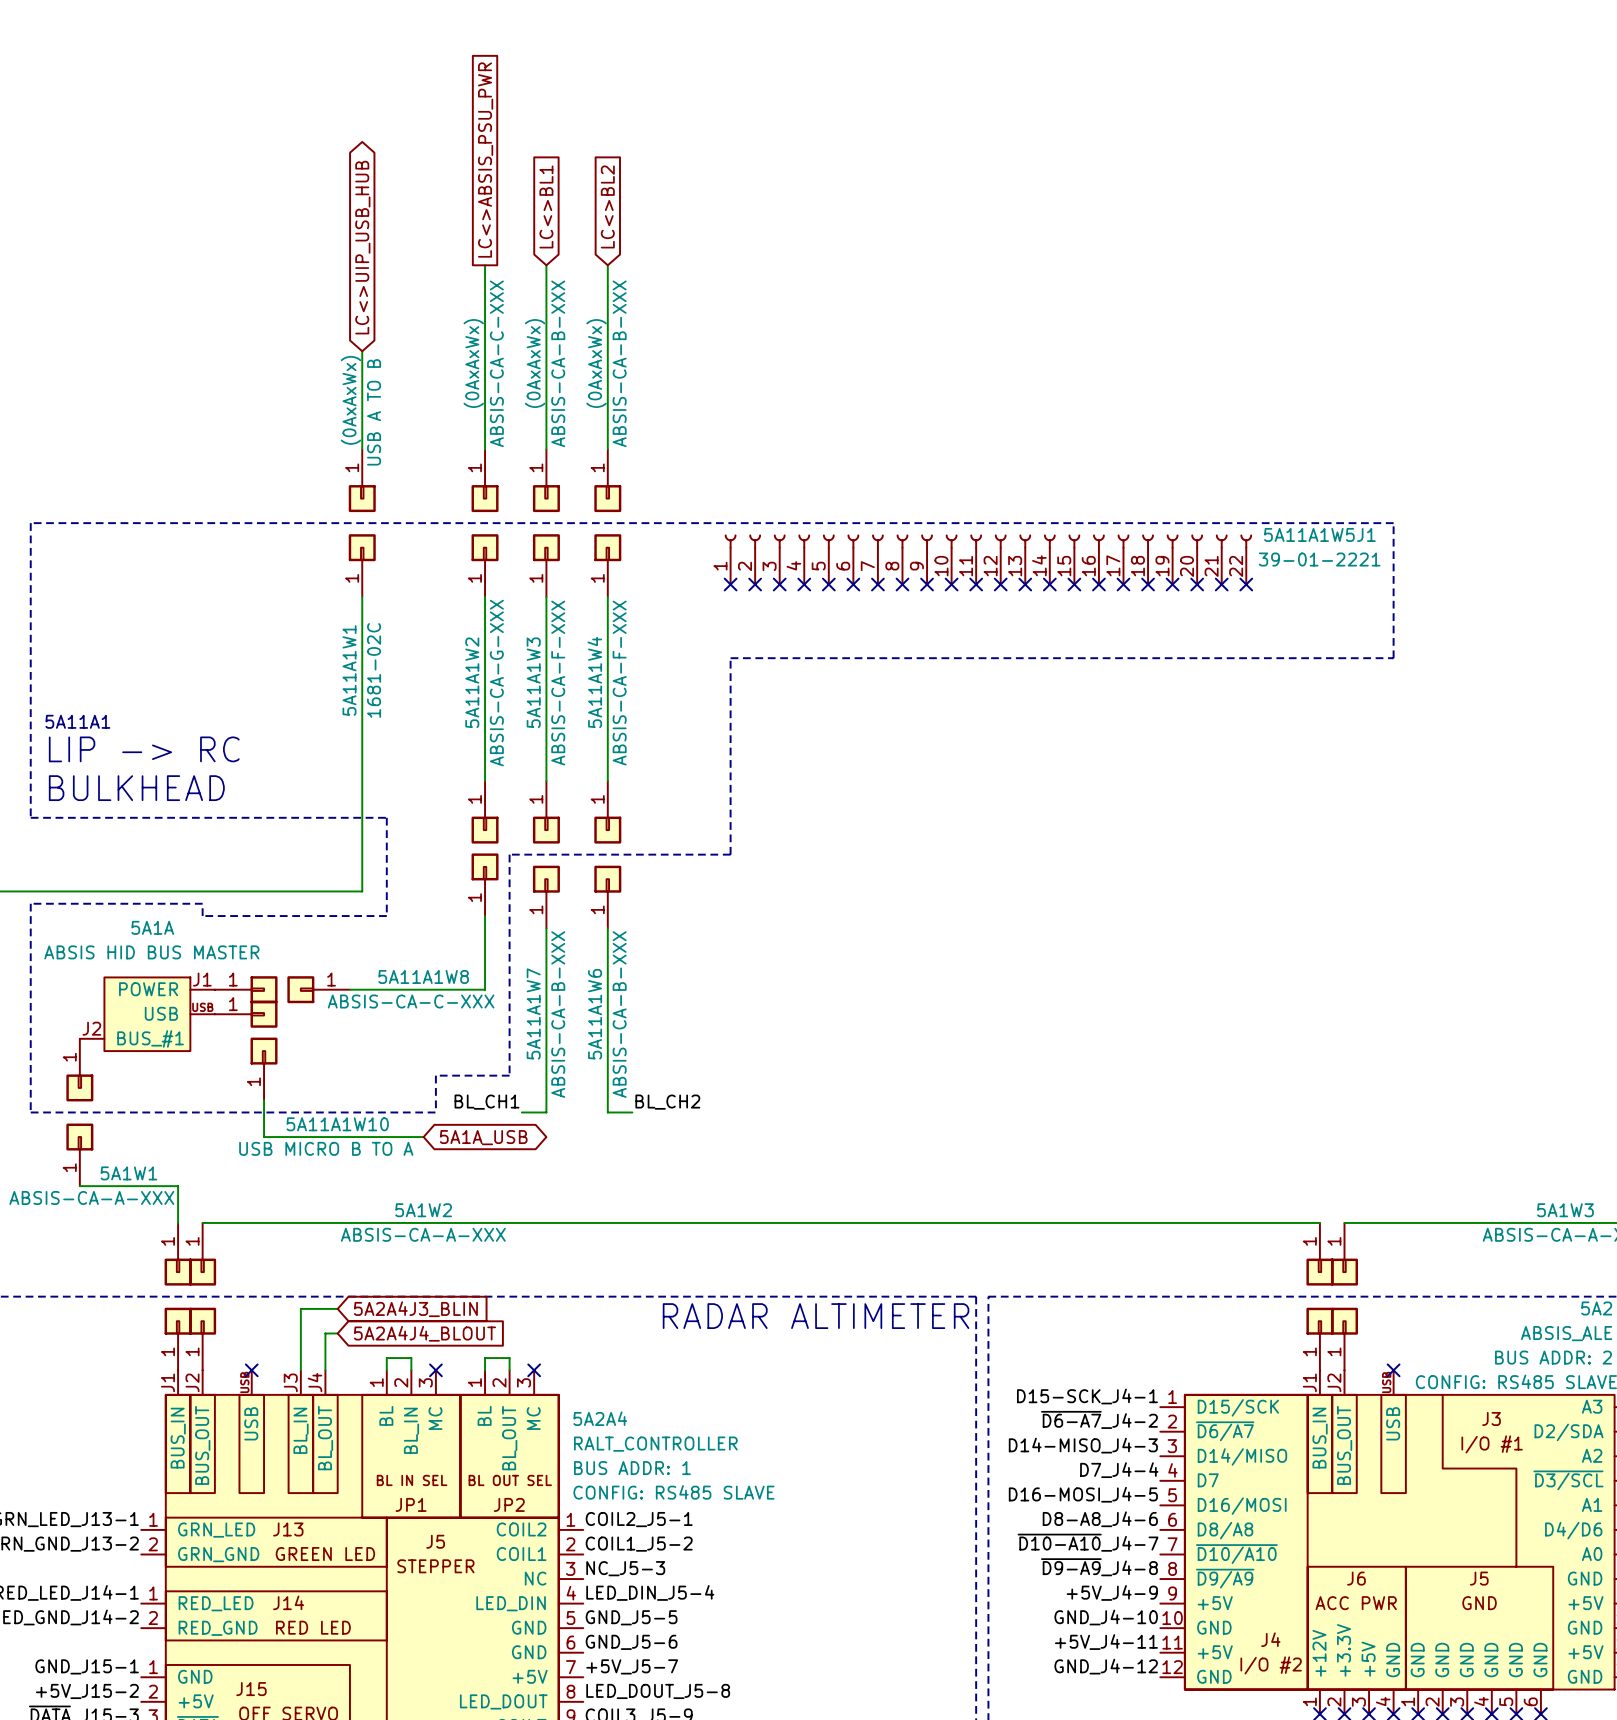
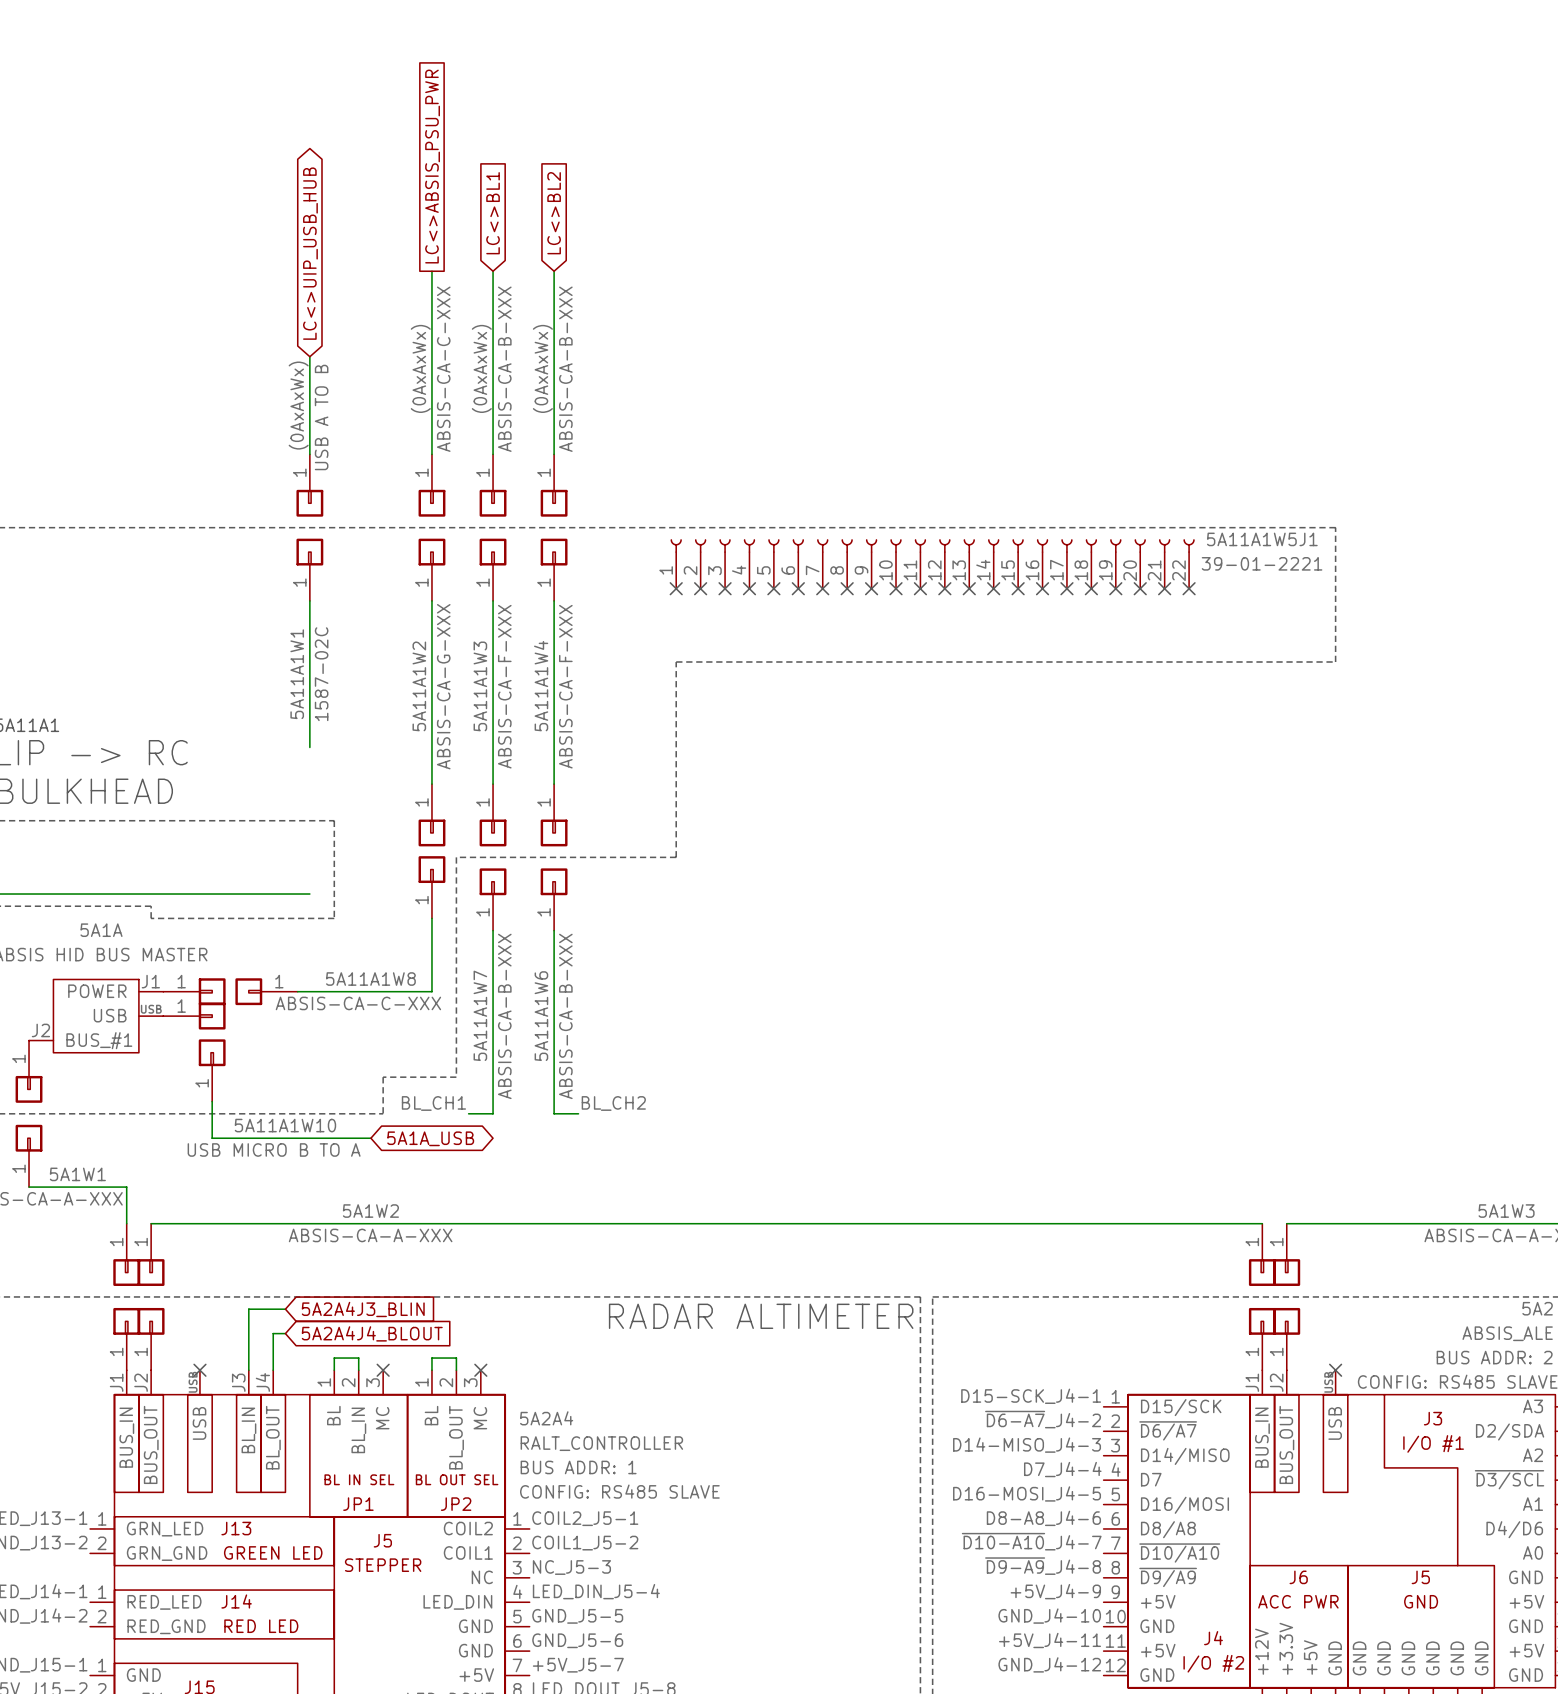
5A11A1W1 value: 1681-02C (374, 670) -> 1587-02C (321, 674)
wire: (362, 744) (362, 891) -> none

